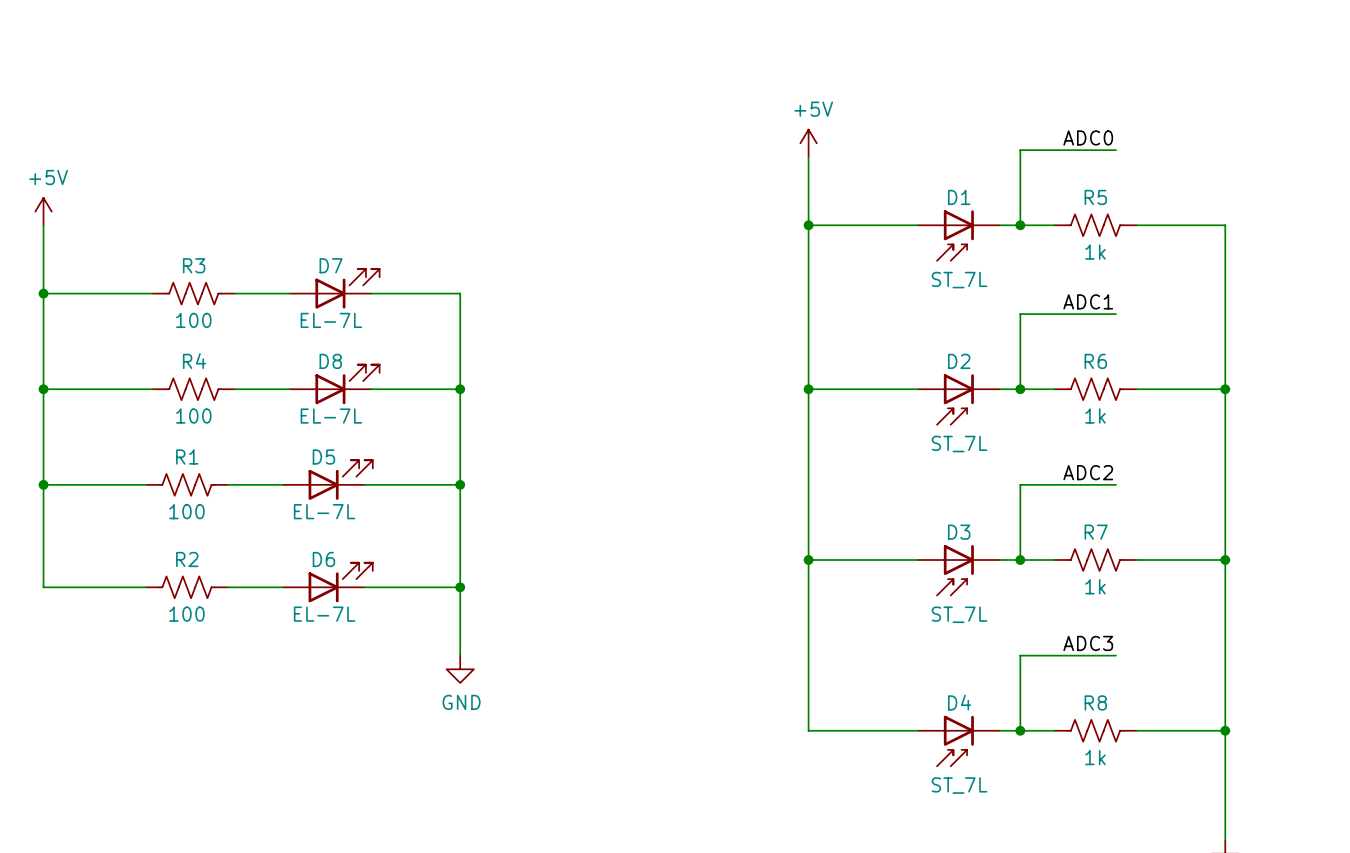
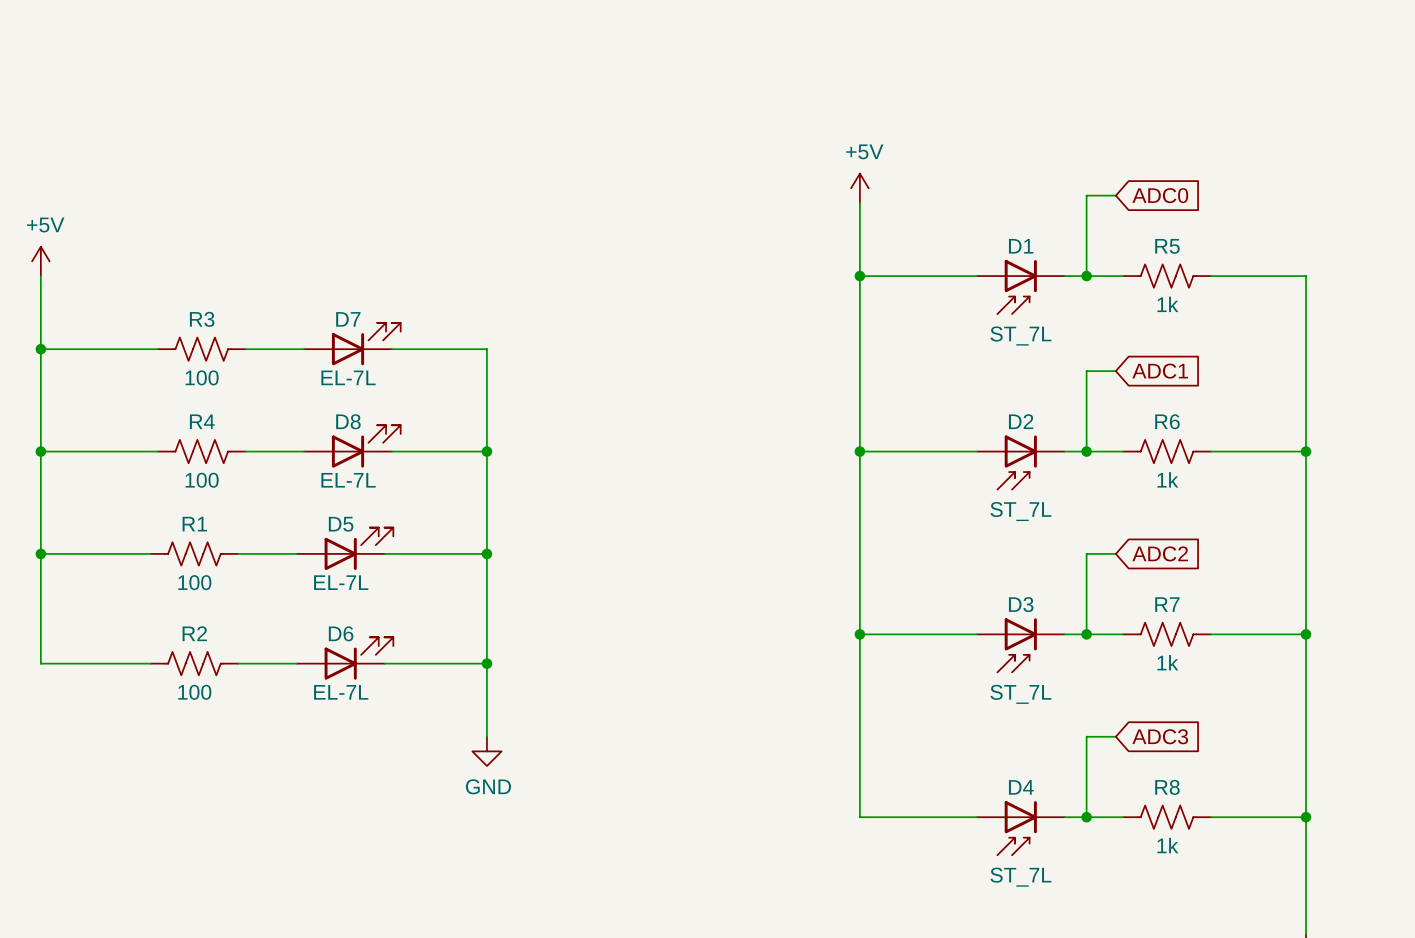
label: ADC0 (1088, 137) -> none
wire: (1047, 150) (1115, 150) -> none
global label: none -> ADC0 (1160, 195)
label: ADC1 (1088, 301) -> none
wire: (1047, 314) (1115, 314) -> none
global label: none -> ADC1 (1160, 371)
label: ADC2 (1088, 472) -> none
wire: (1047, 484) (1115, 484) -> none
global label: none -> ADC2 (1160, 553)
label: ADC3 (1088, 643) -> none
wire: (1047, 655) (1115, 655) -> none
global label: none -> ADC3 (1160, 736)

